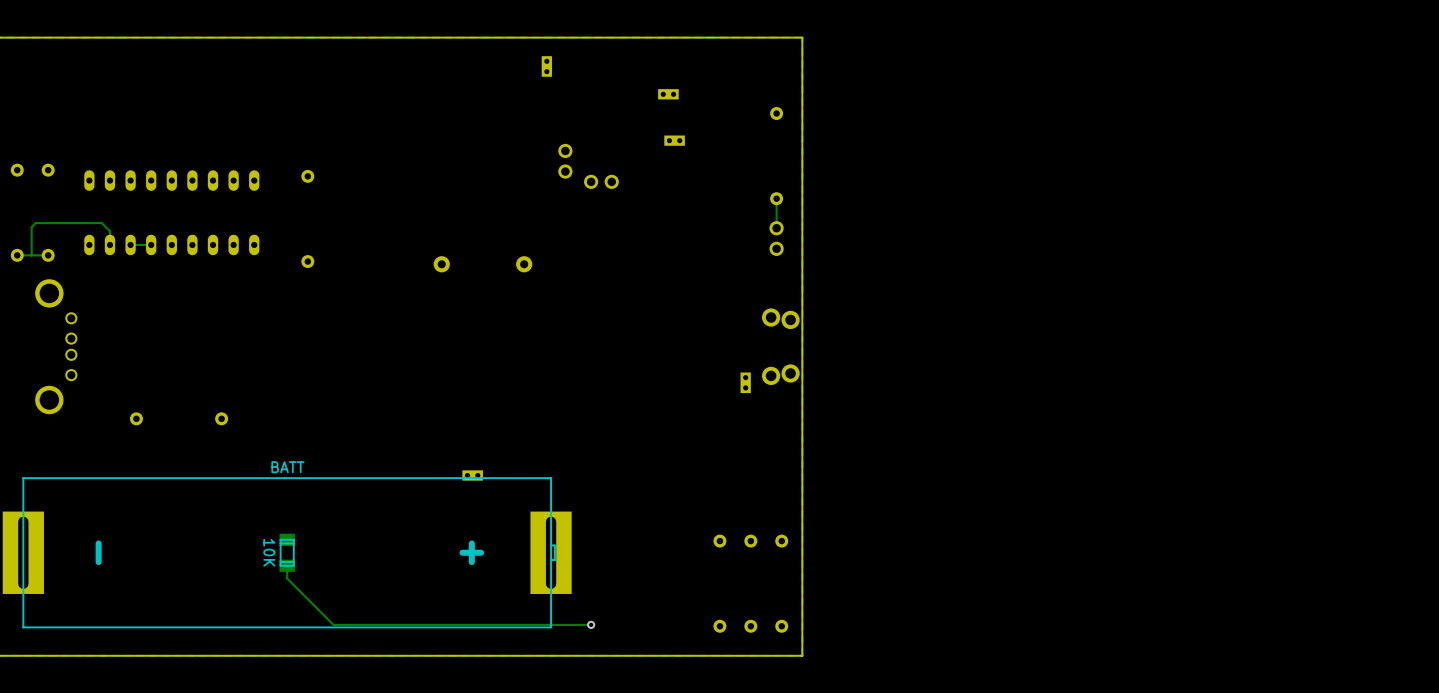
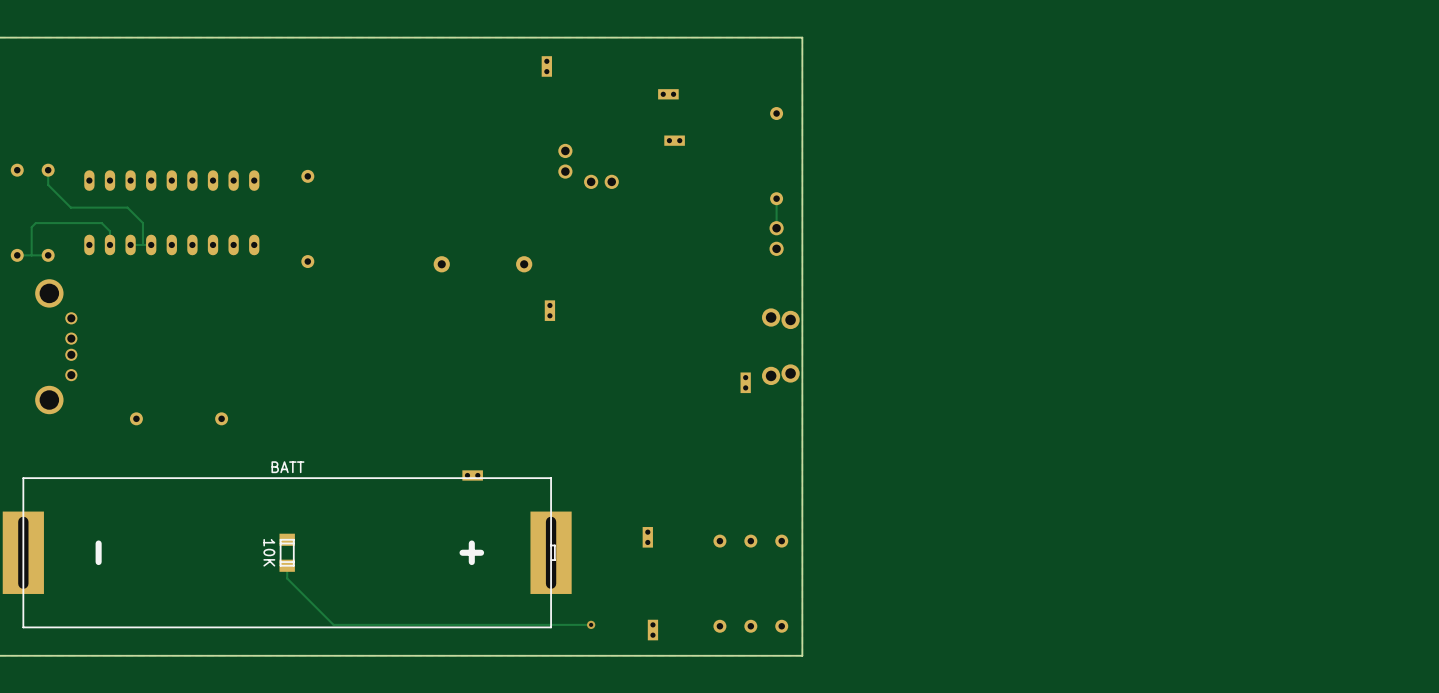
track: none -> (48, 170) (48, 184) (70, 207) (127, 207) (142, 223) (142, 243)
part: none -> (549, 310)
part: none -> (647, 537)
part: none -> (652, 630)

